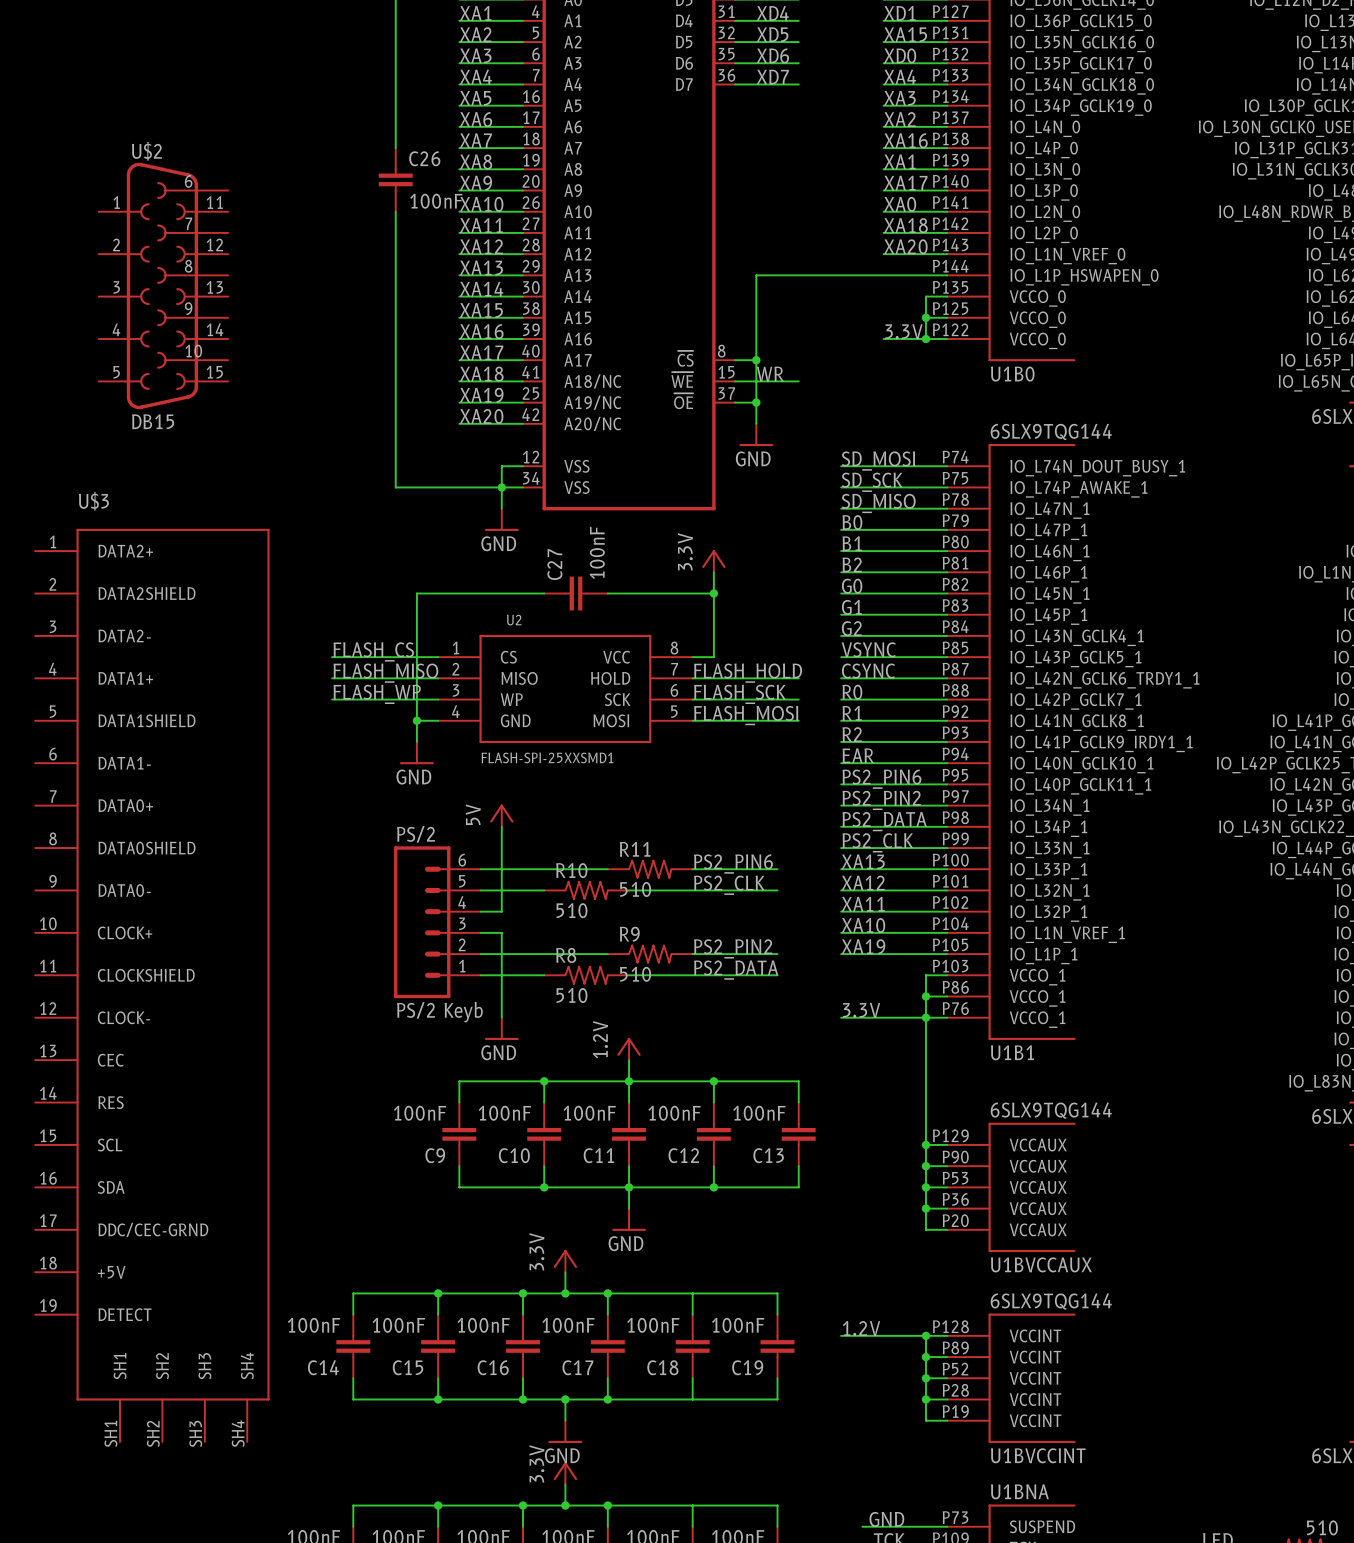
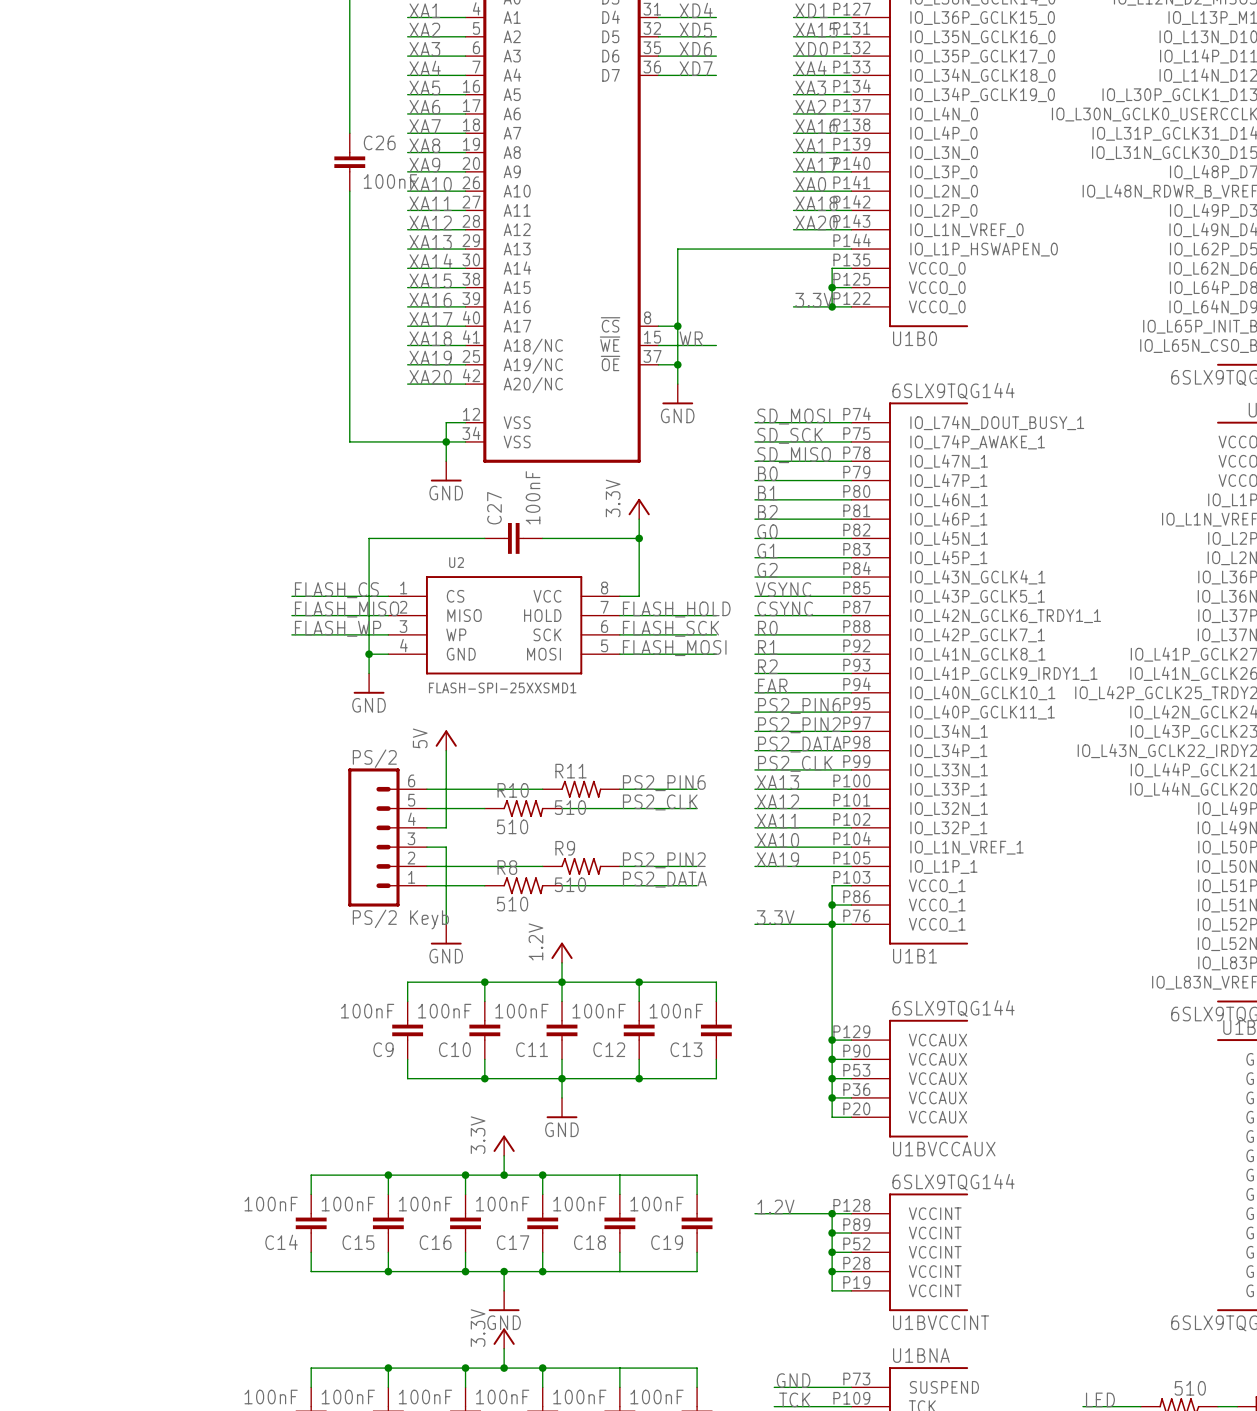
U$2: DB15 (163, 285) -> none
U$3: (152, 985) -> none

